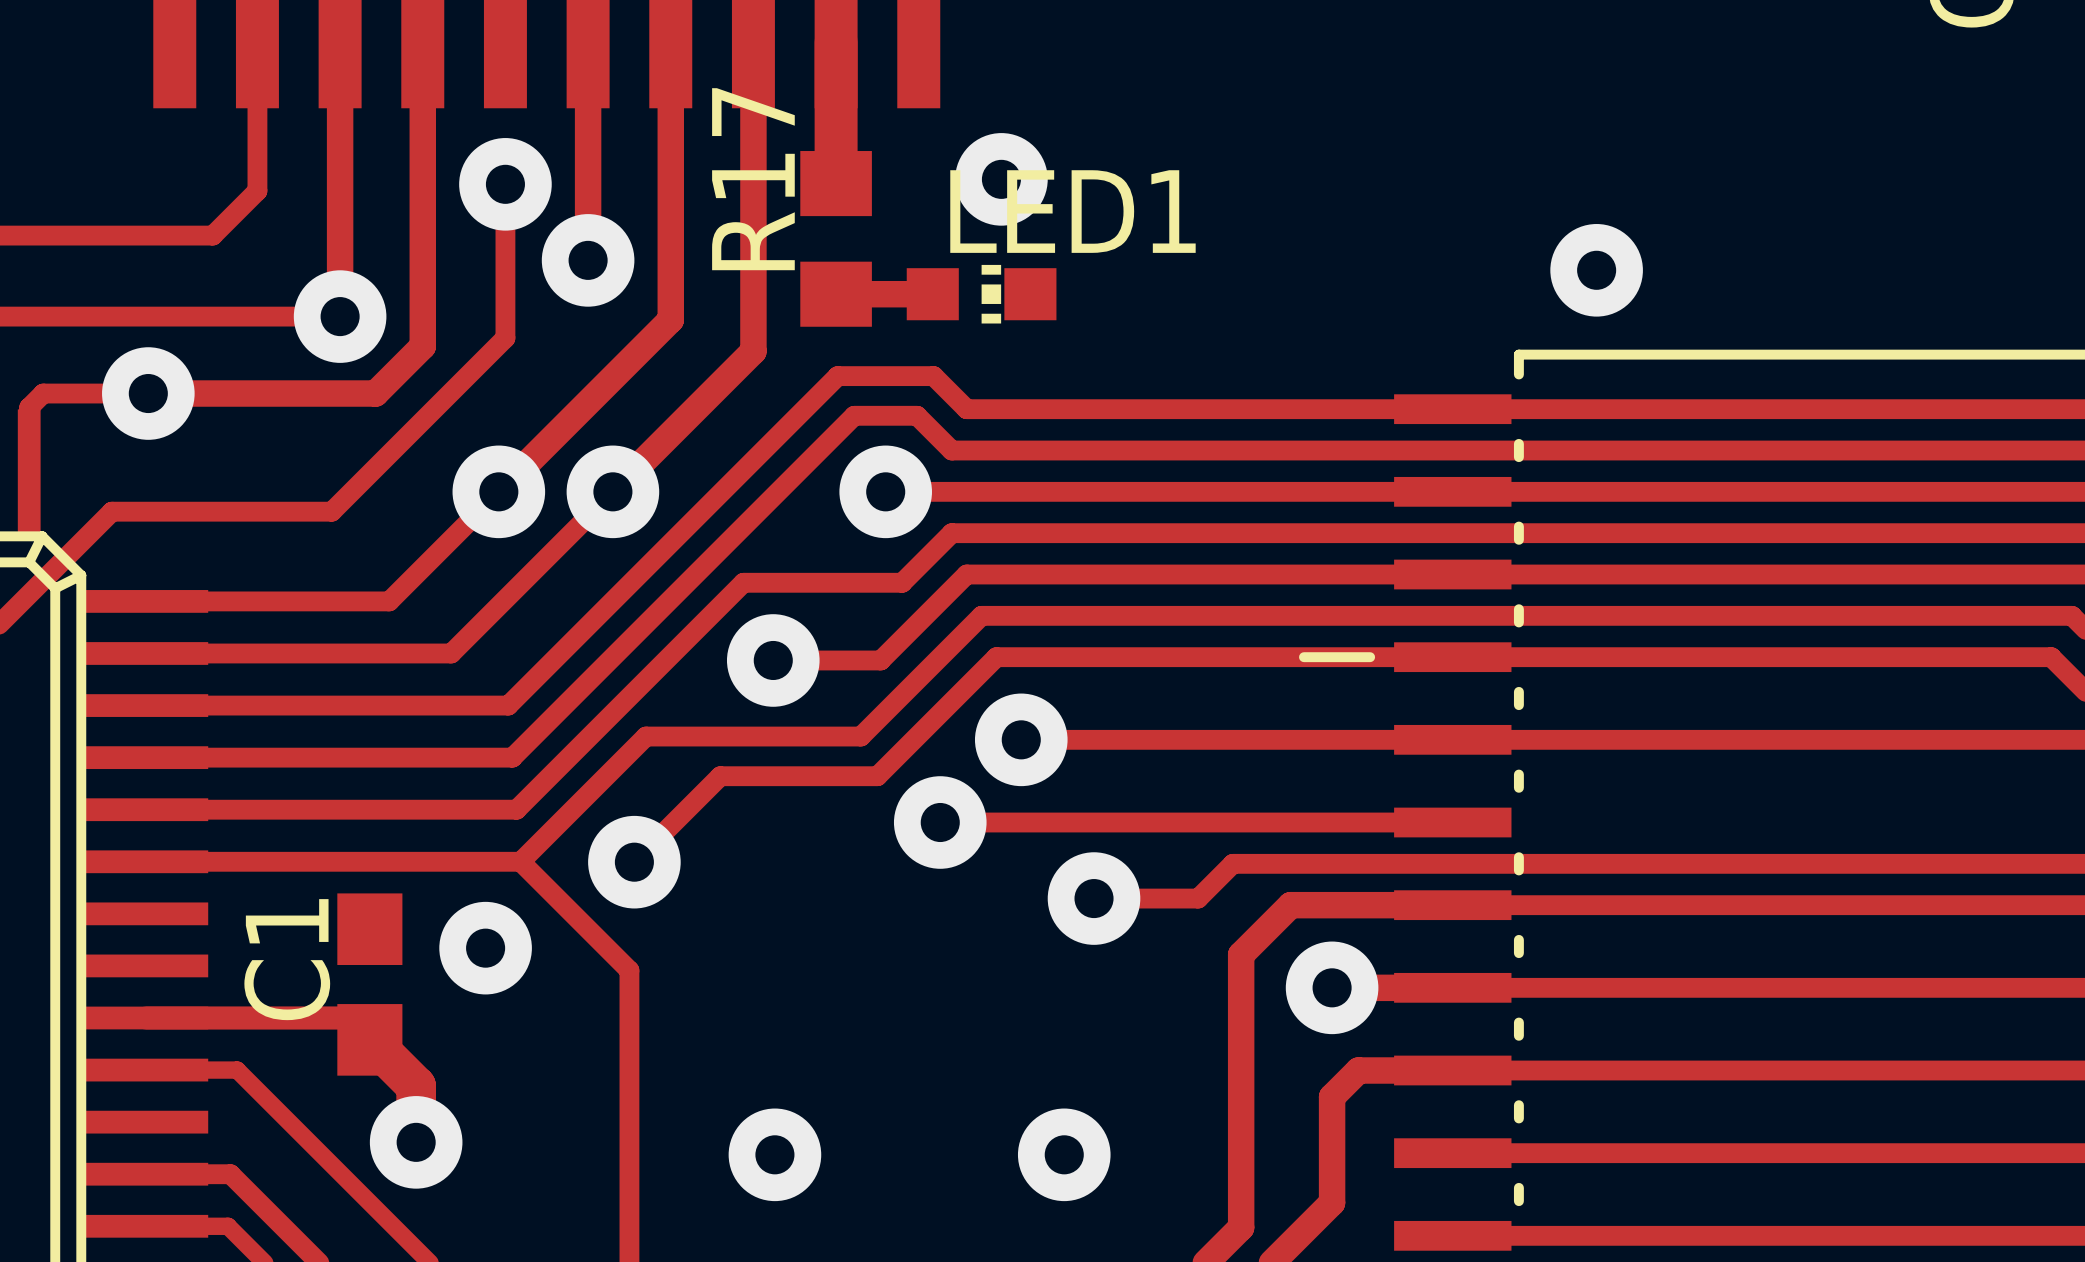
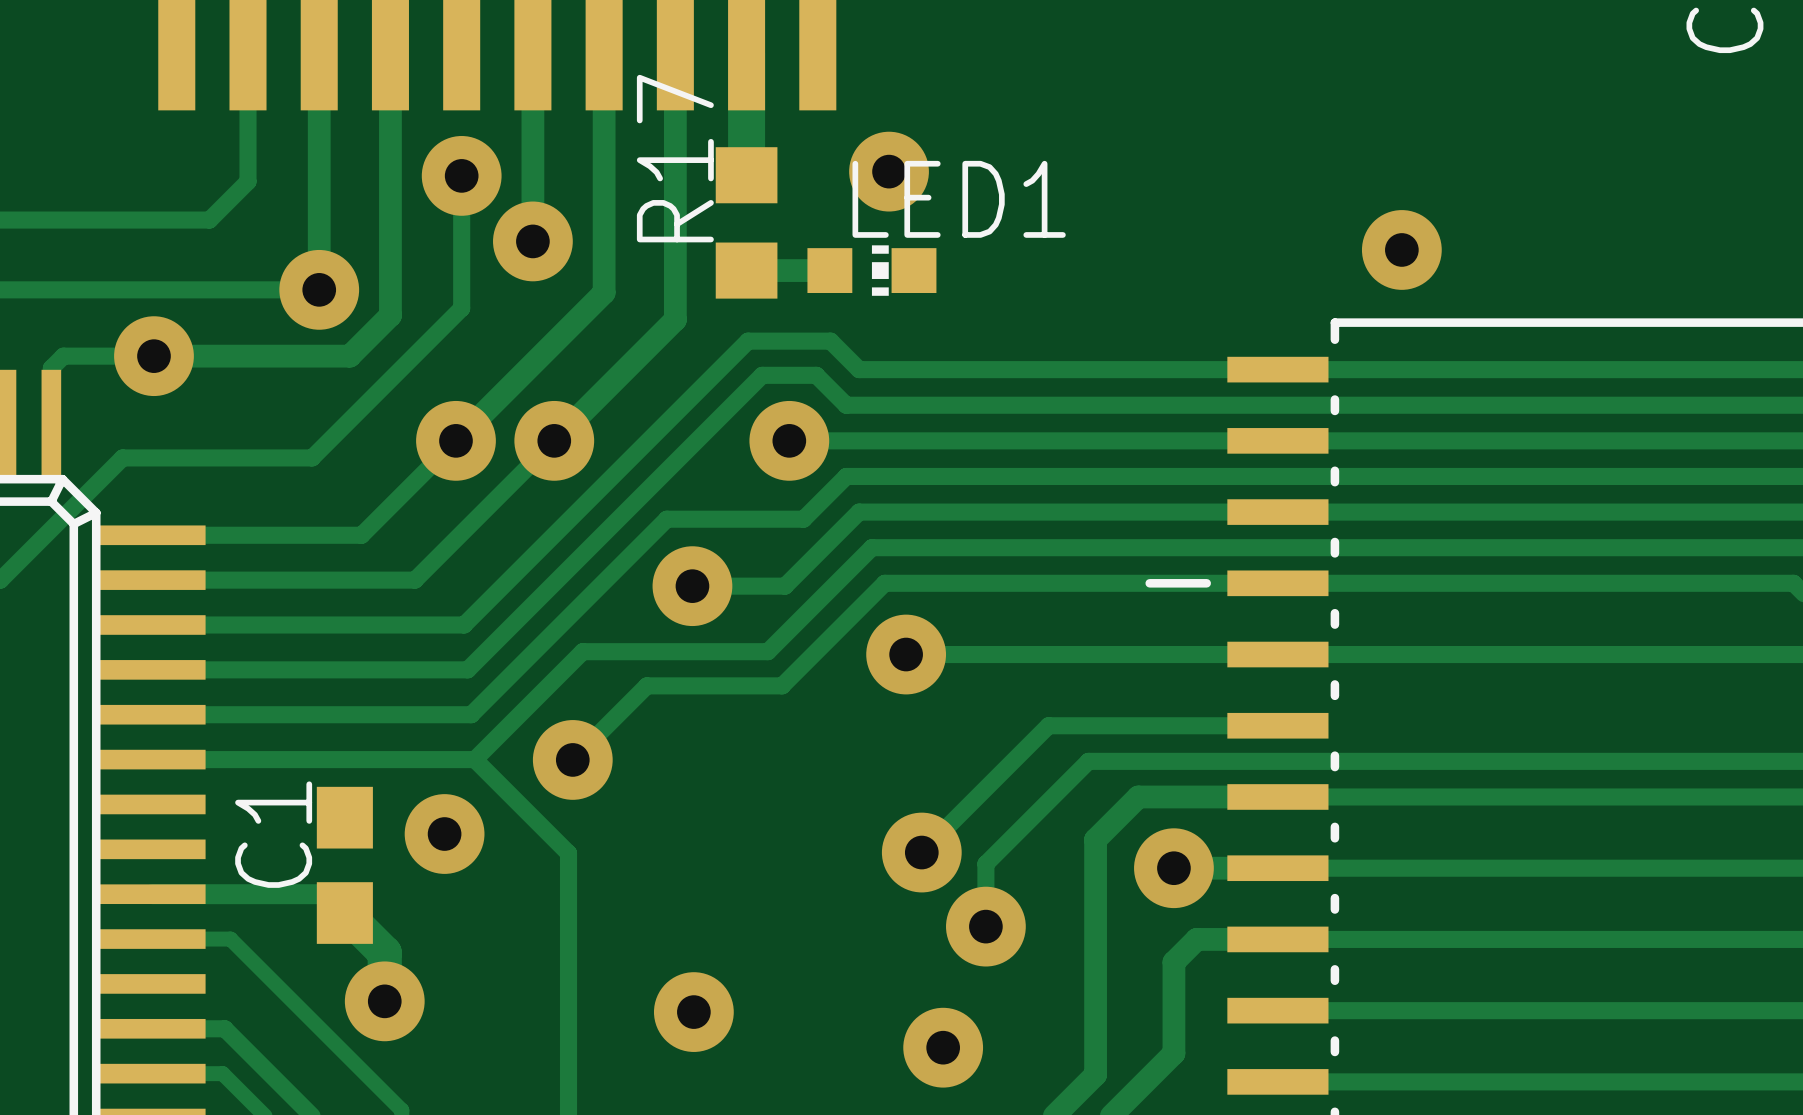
track: (940, 822) (1186, 822) -> (921, 852) (1048, 725)
via: (940, 822) -> none
track: (1094, 898) (1198, 898) -> (985, 926) (985, 863) (1058, 791)
via: (1094, 898) -> none
via: none -> (921, 852)
via: none -> (985, 926)
via position: (1064, 1154) -> (943, 1047)

